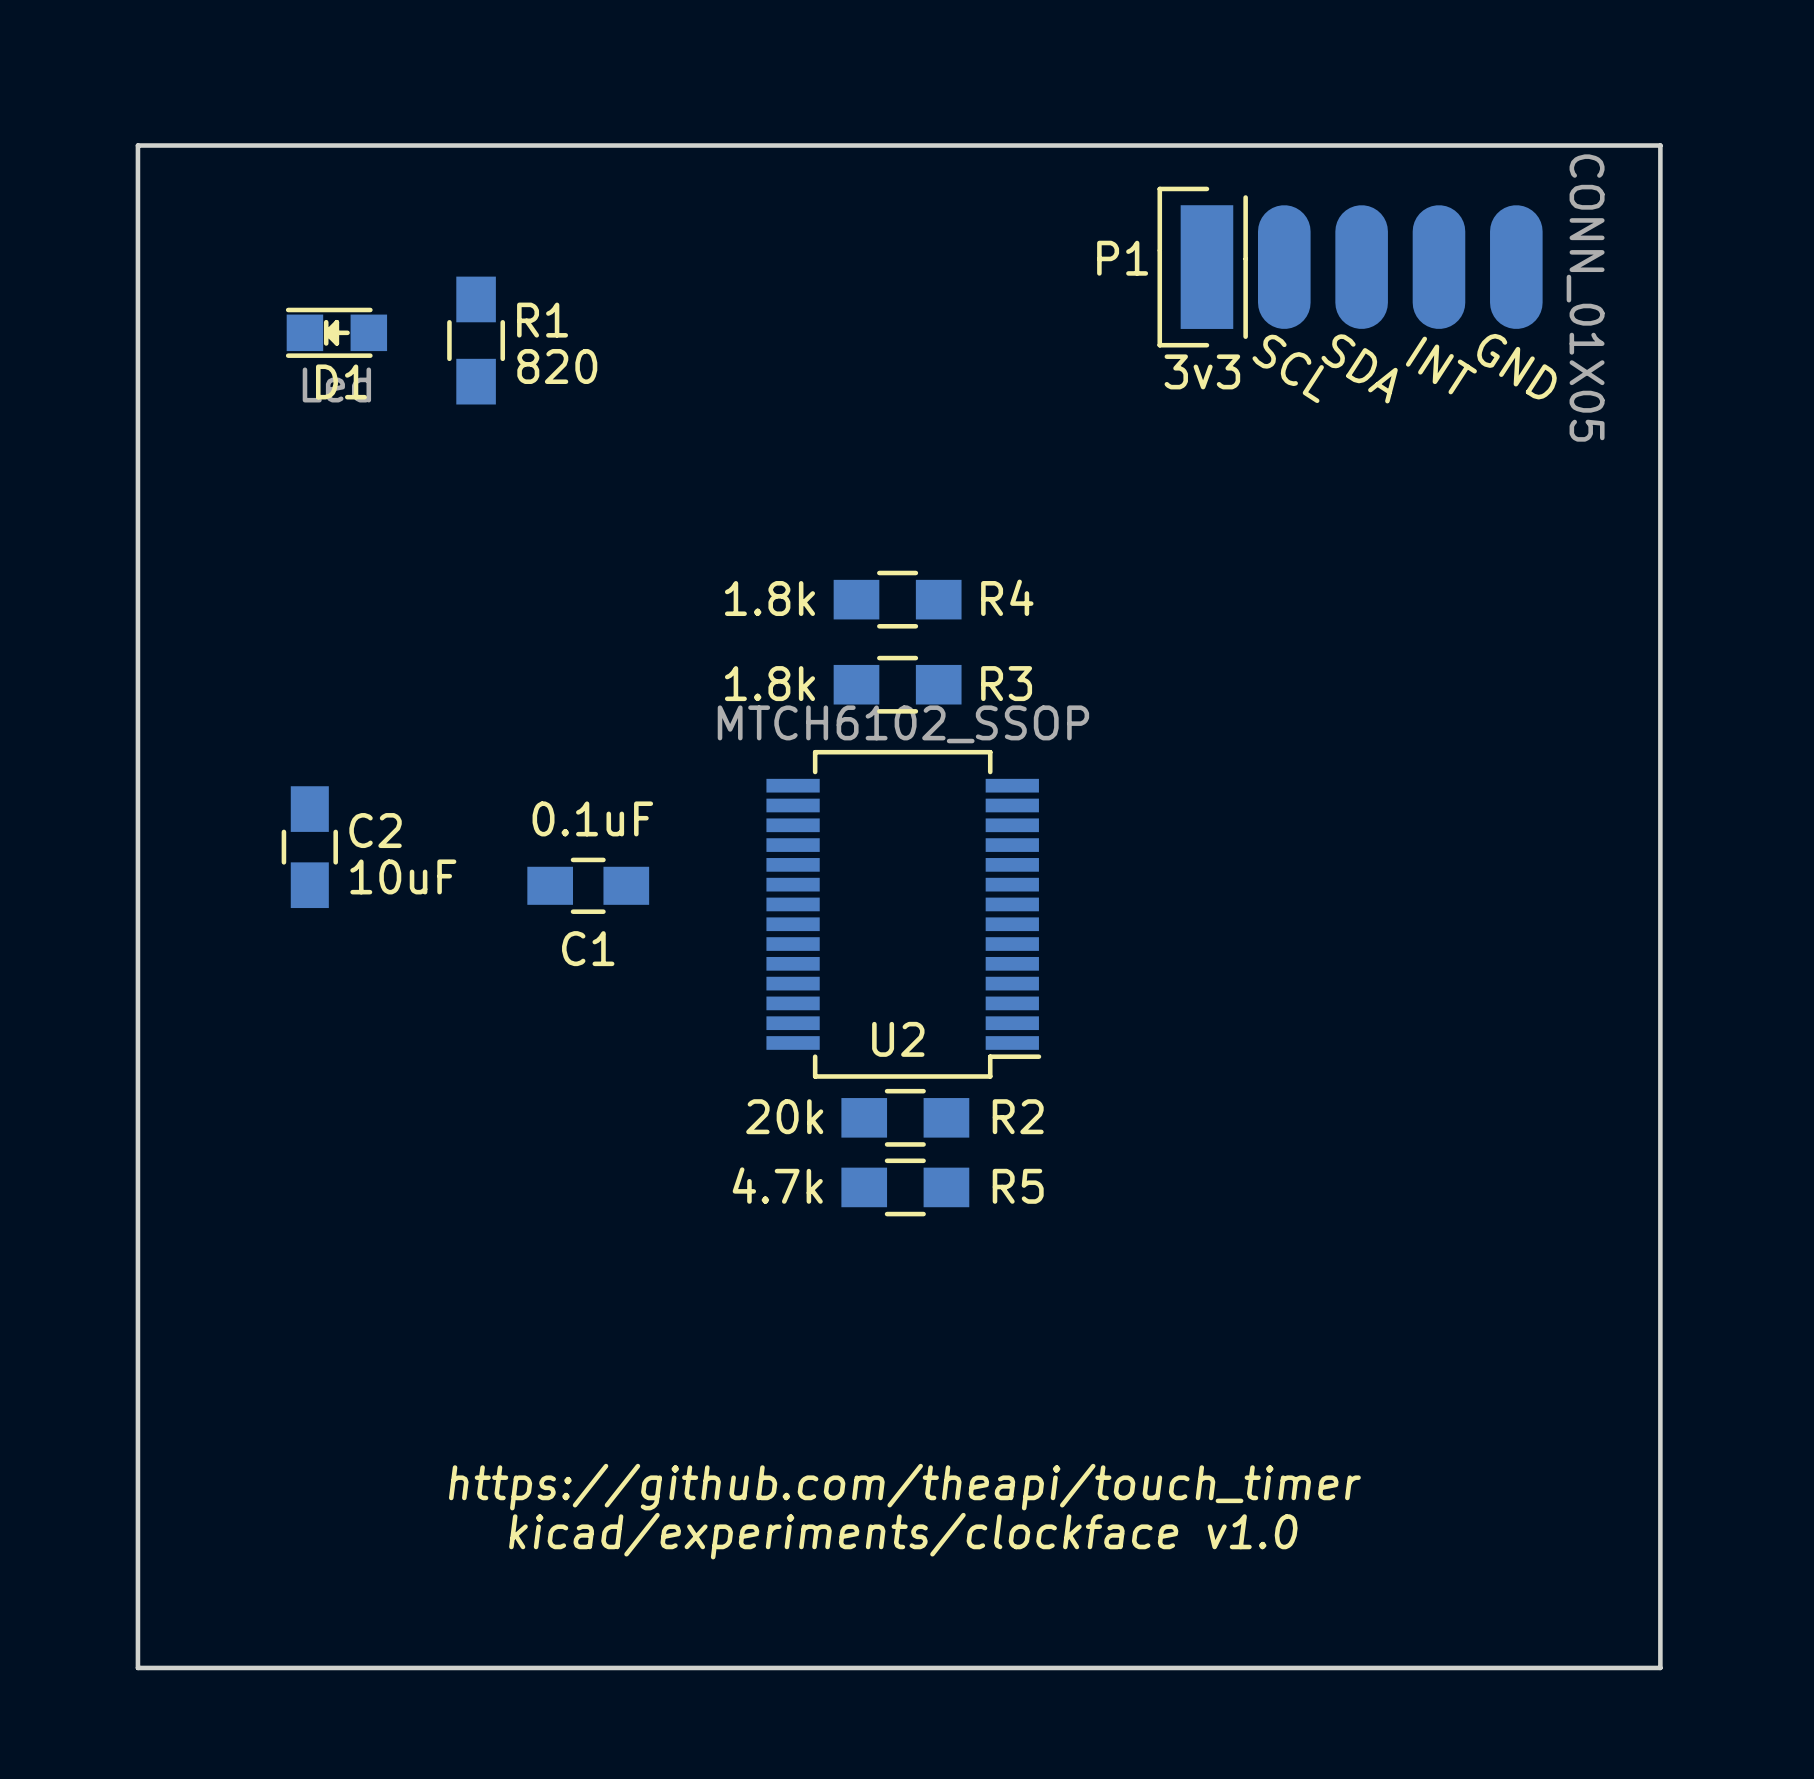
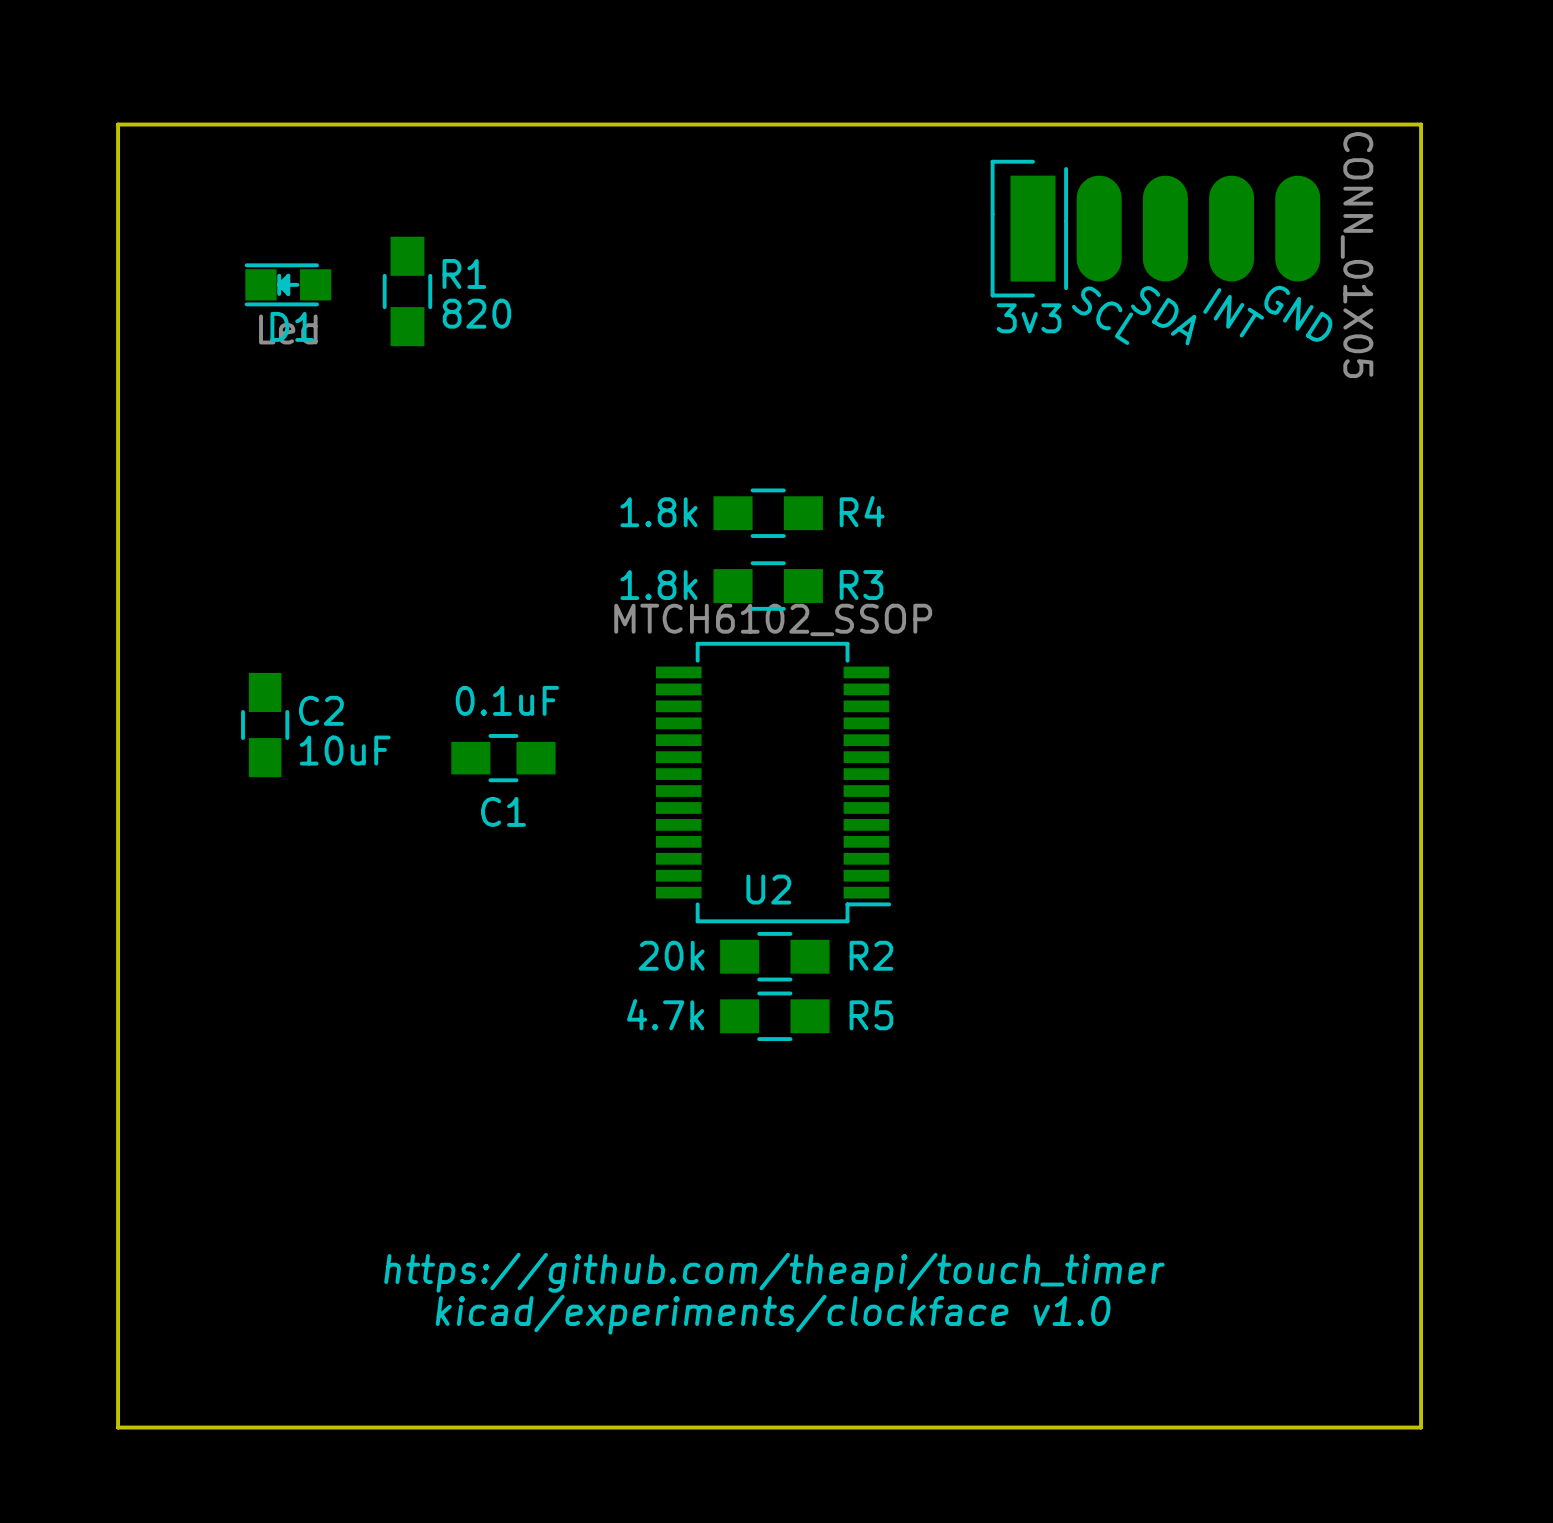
P1 name: P1 (1122, 258) -> none

